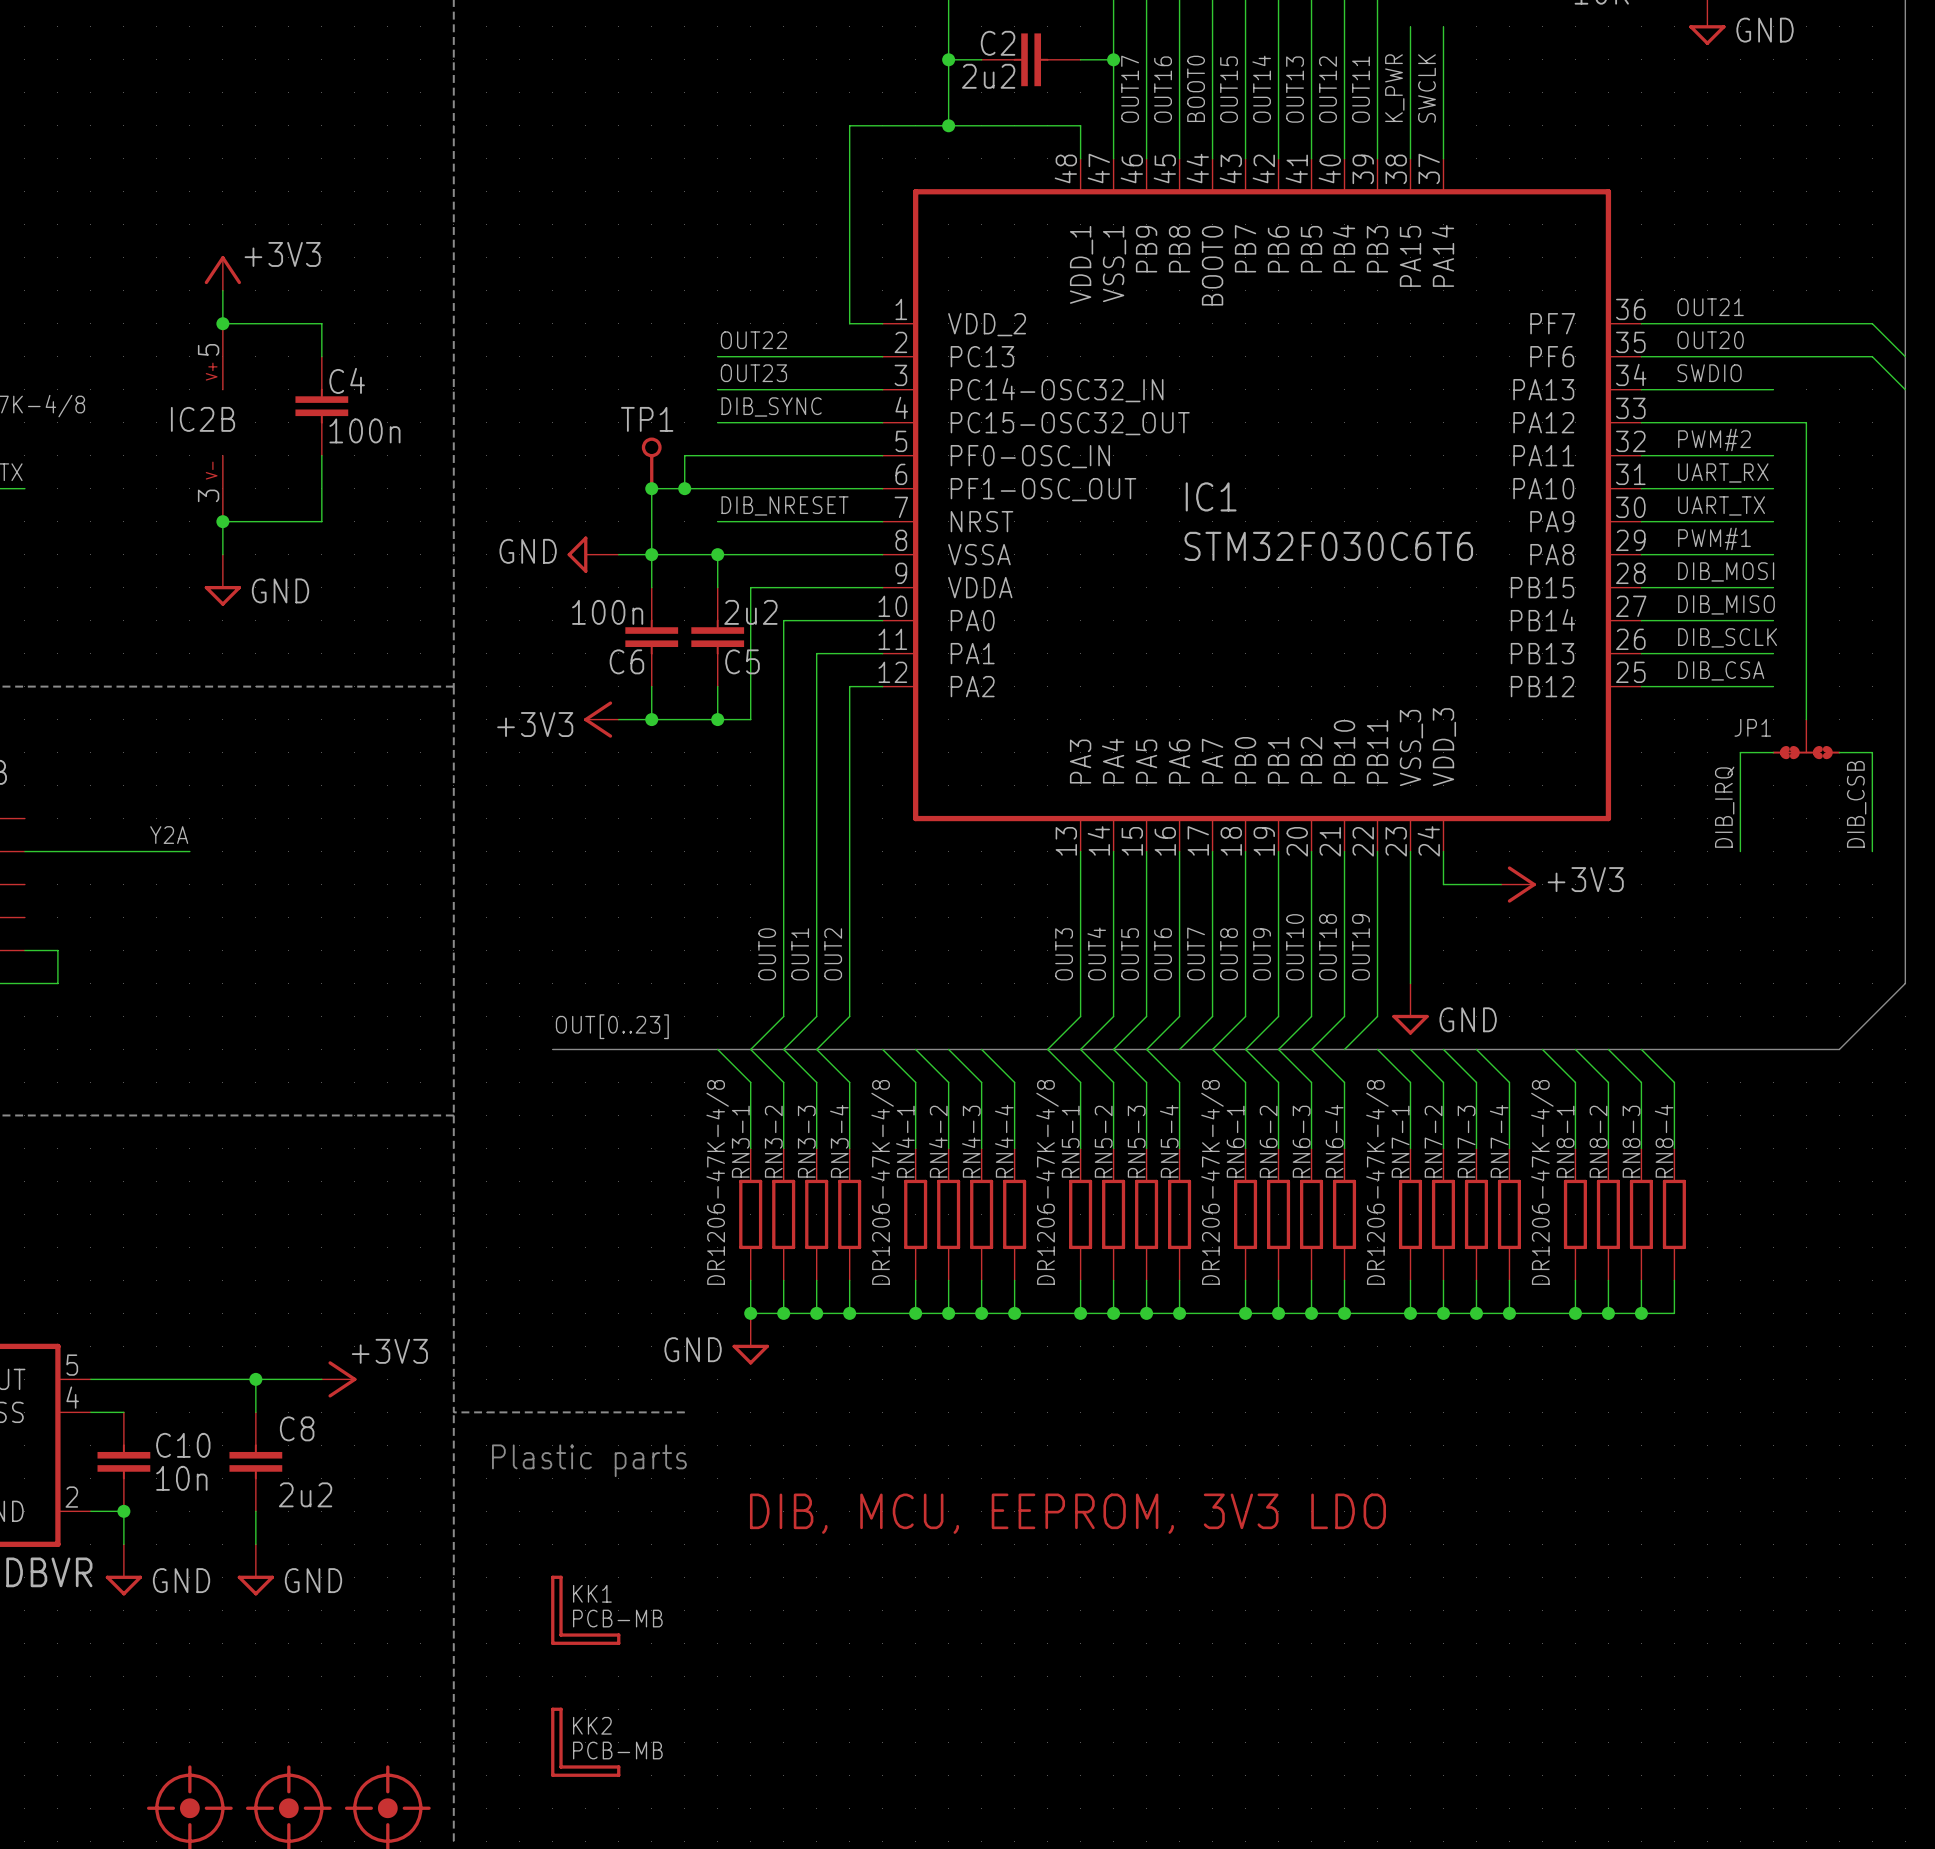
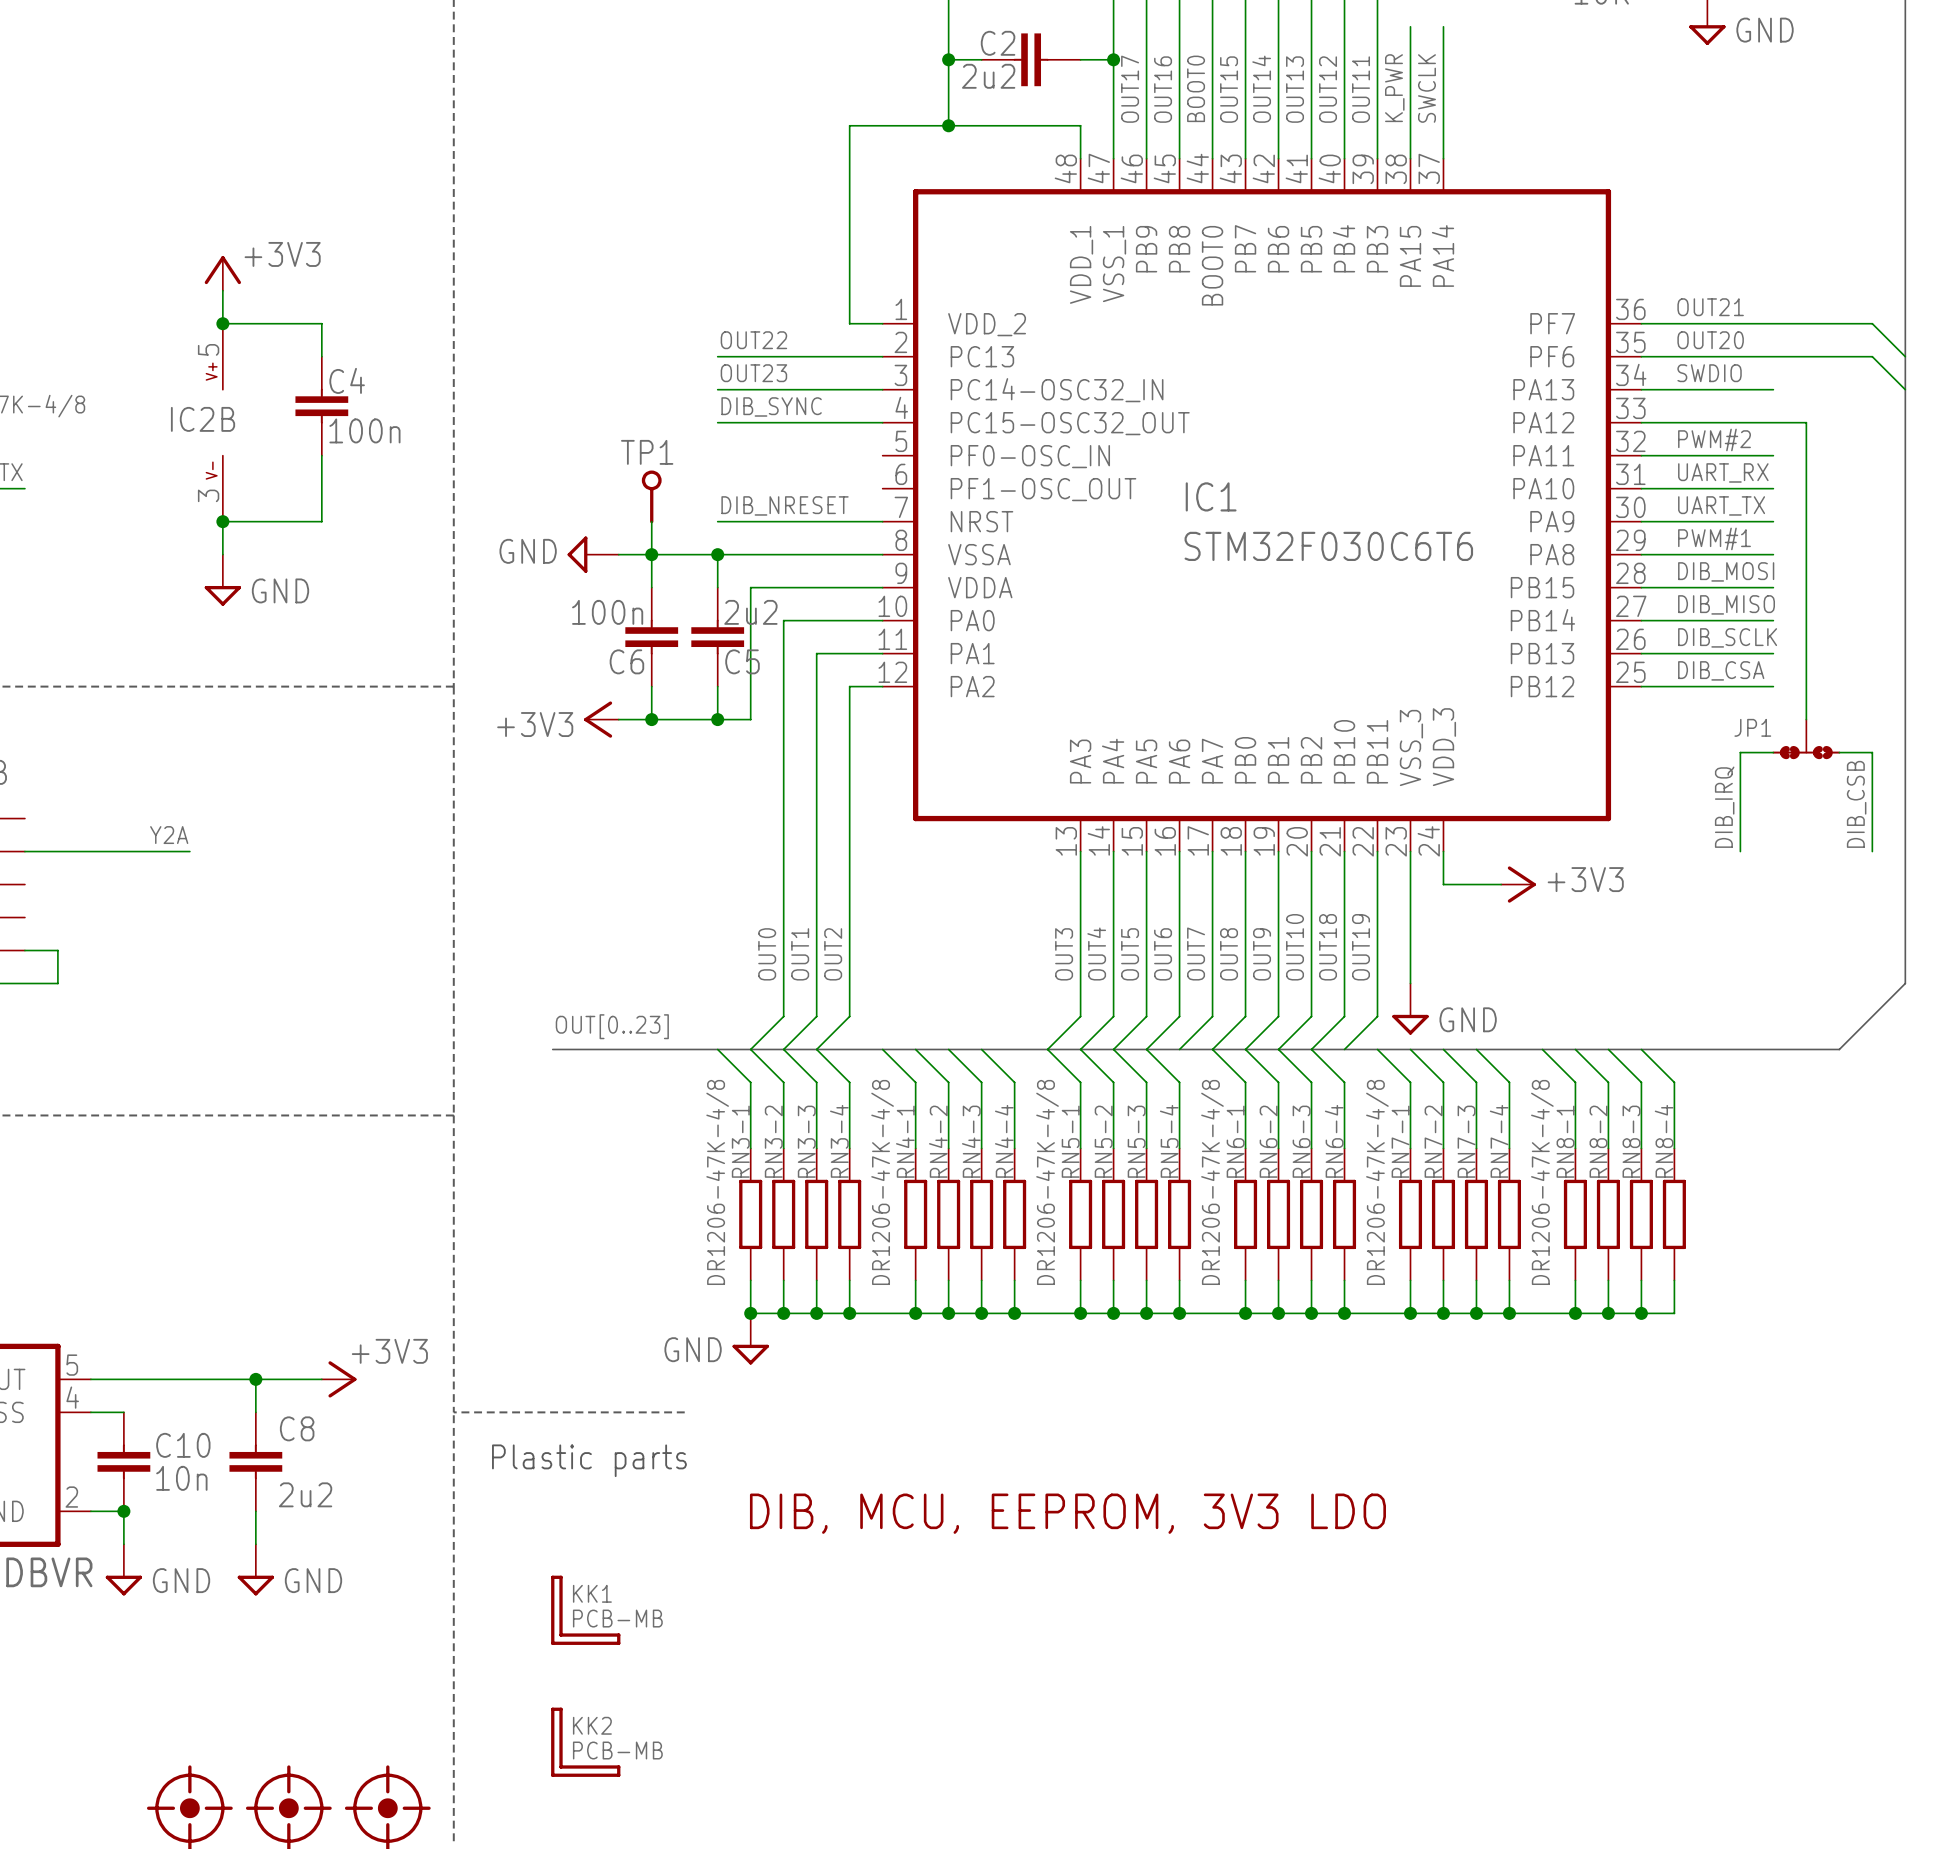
wire: (882, 455) (684, 455) (684, 488) -> none
TP1 position: (651, 463) -> (651, 496)
junction: (651, 488) -> none
junction: (684, 488) -> none
wire: (882, 488) (651, 488) (651, 521) -> none

